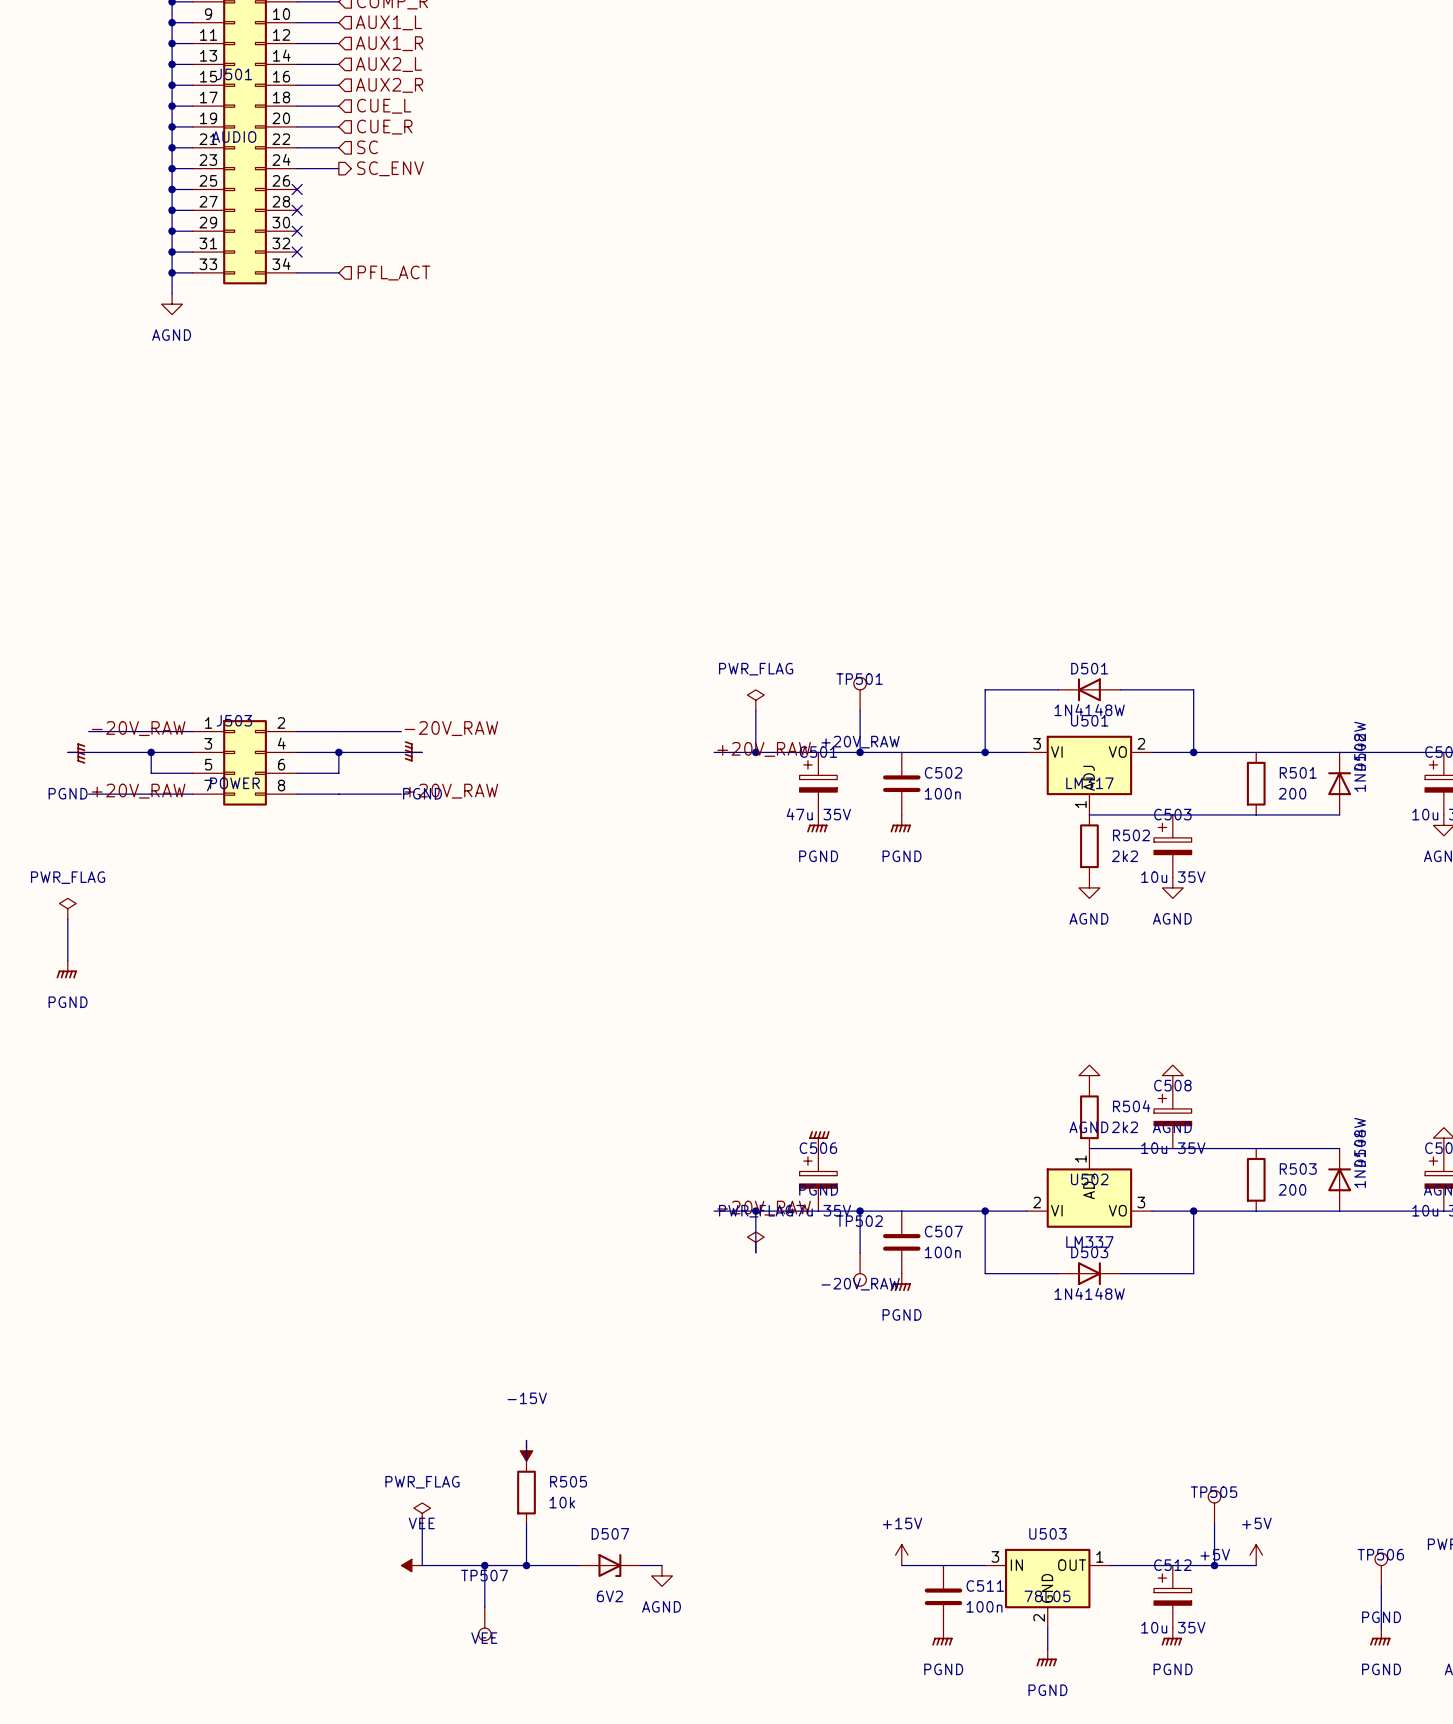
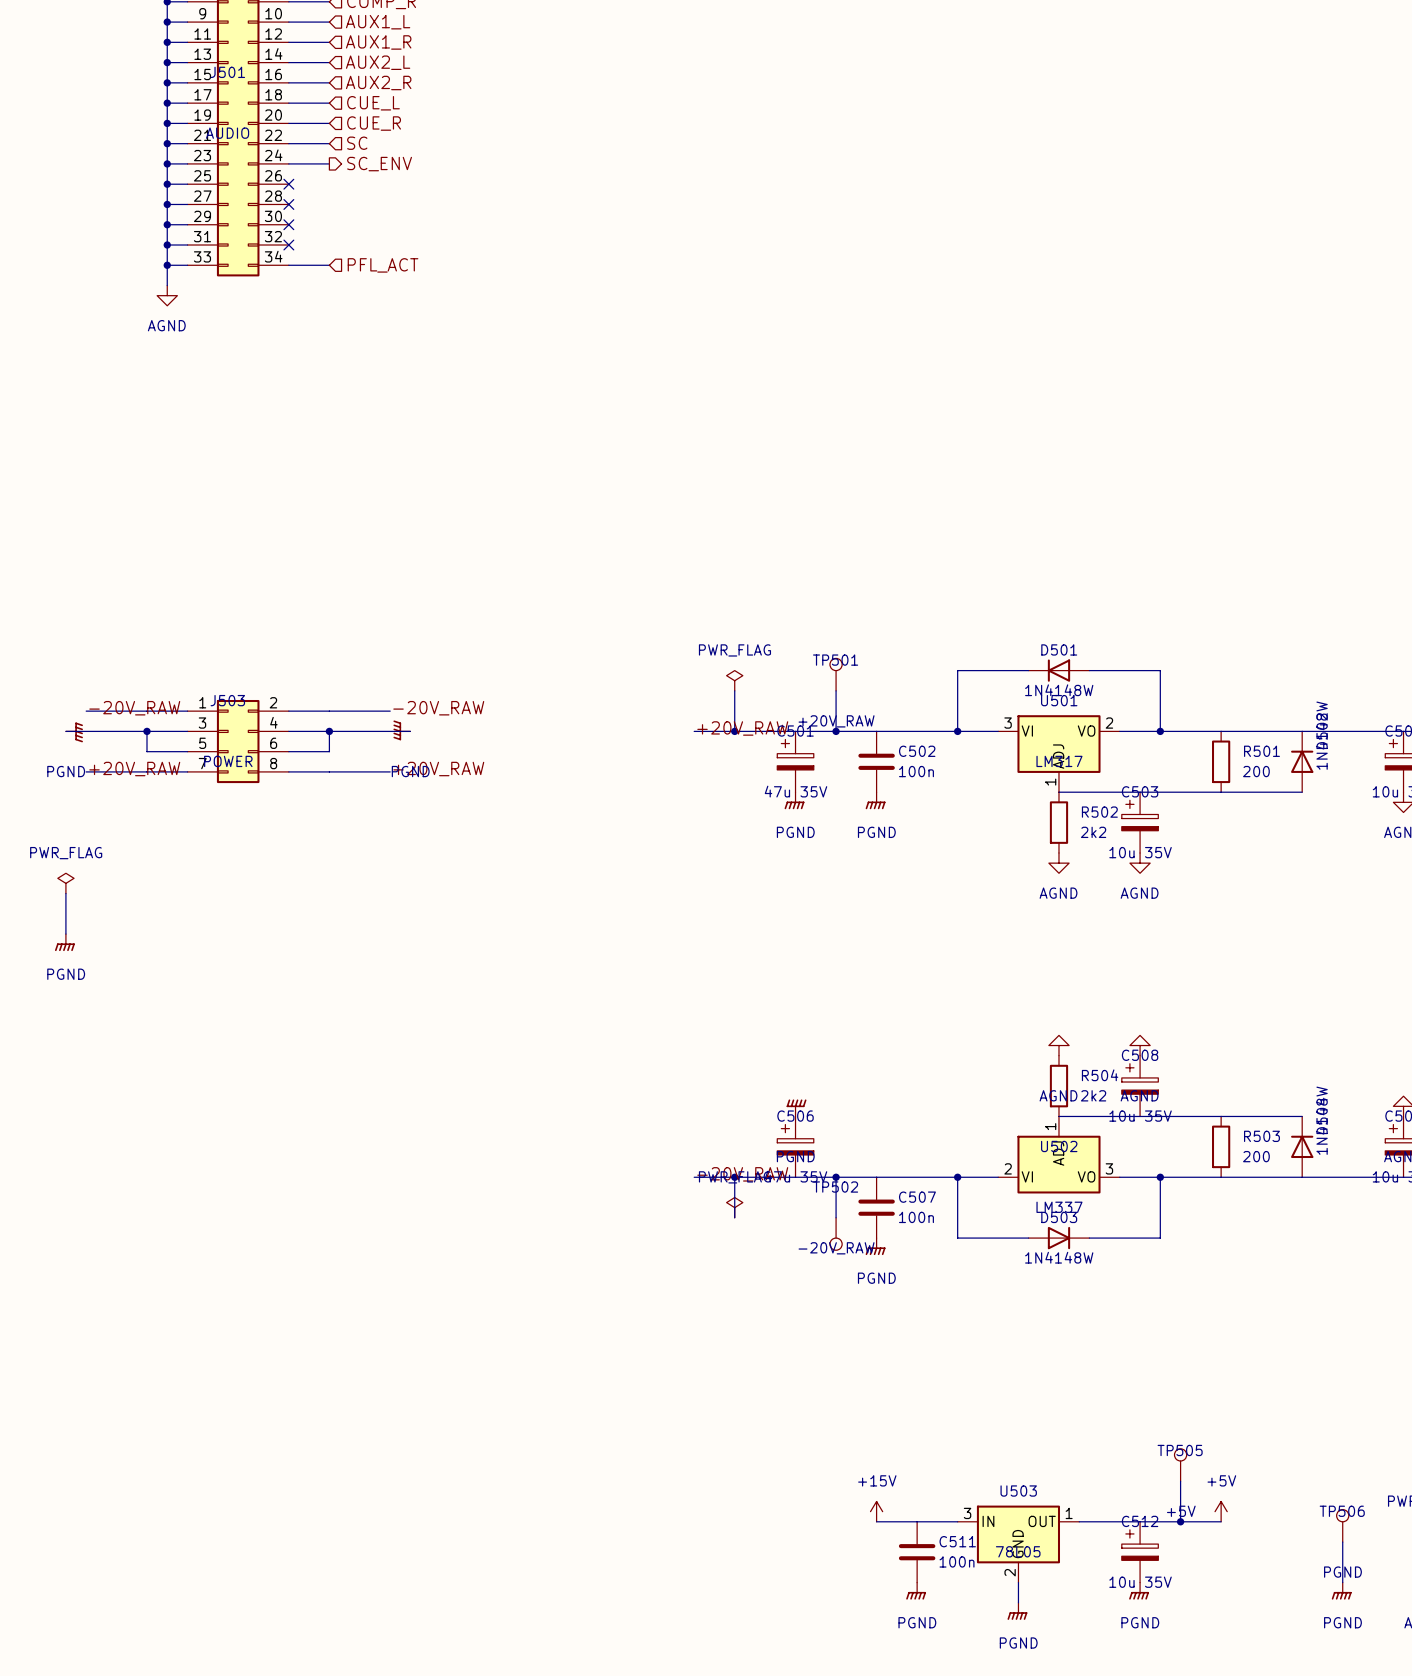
wire: (526, 1440) (526, 1461) -> none
power symbol: -15V (526, 1450) -> none
R505: 10k (526, 1492) -> none
power symbol: PWR_FLAG (422, 1513) -> none
wire: (422, 1523) (422, 1565) (578, 1565) -> none
wire: (526, 1523) (526, 1565) -> none
power symbol: VEE (411, 1565) -> none
wire: (484, 1565) (484, 1607) -> none
junction: (484, 1565) -> none
junction: (526, 1565) -> none
D507: 6V2 (609, 1565) -> none
wire: (641, 1565) (662, 1565) -> none
power symbol: AGND (662, 1575) -> none
TP507: VEE (484, 1623) -> none

